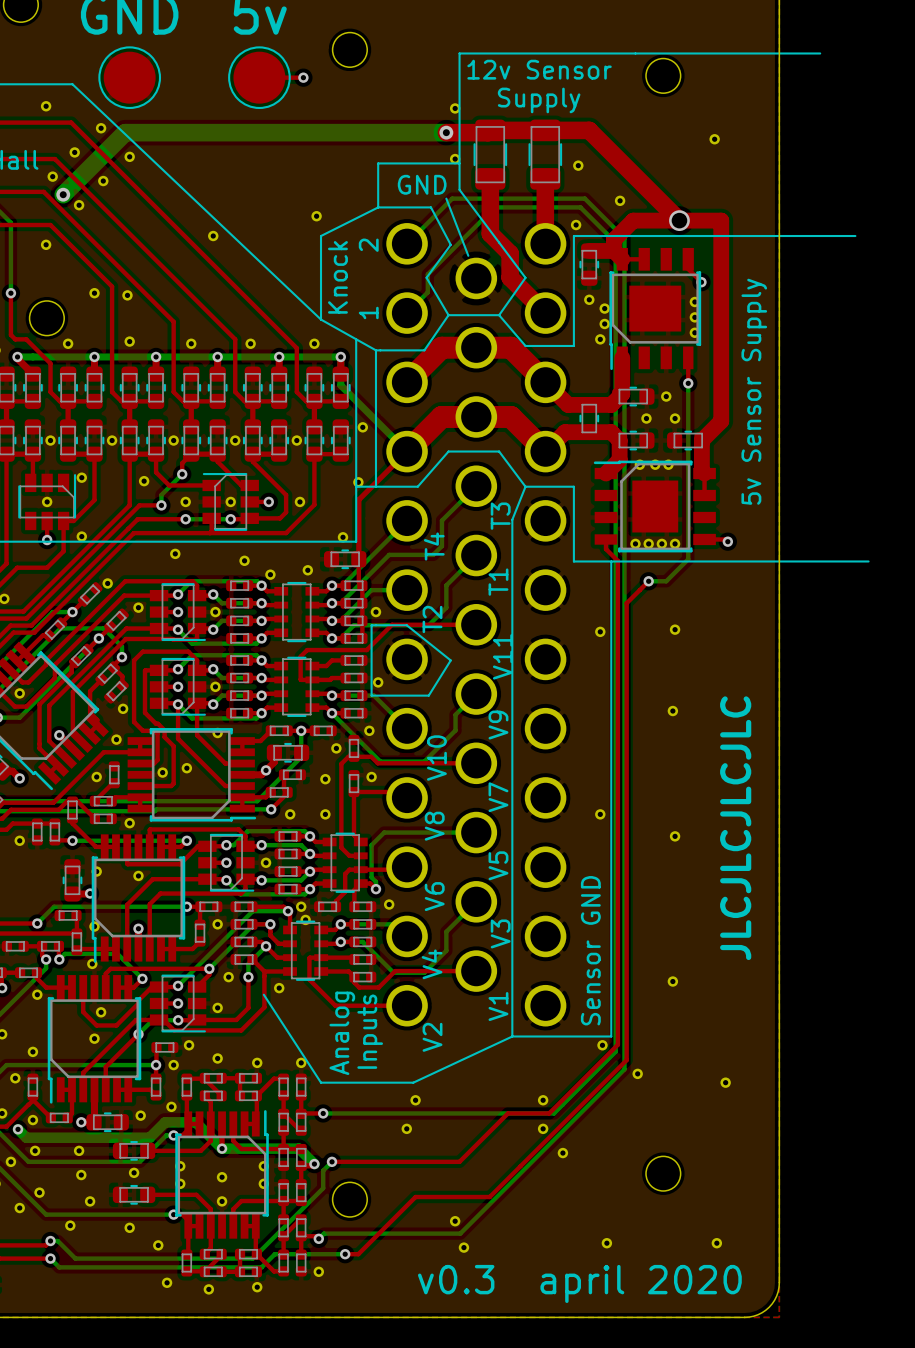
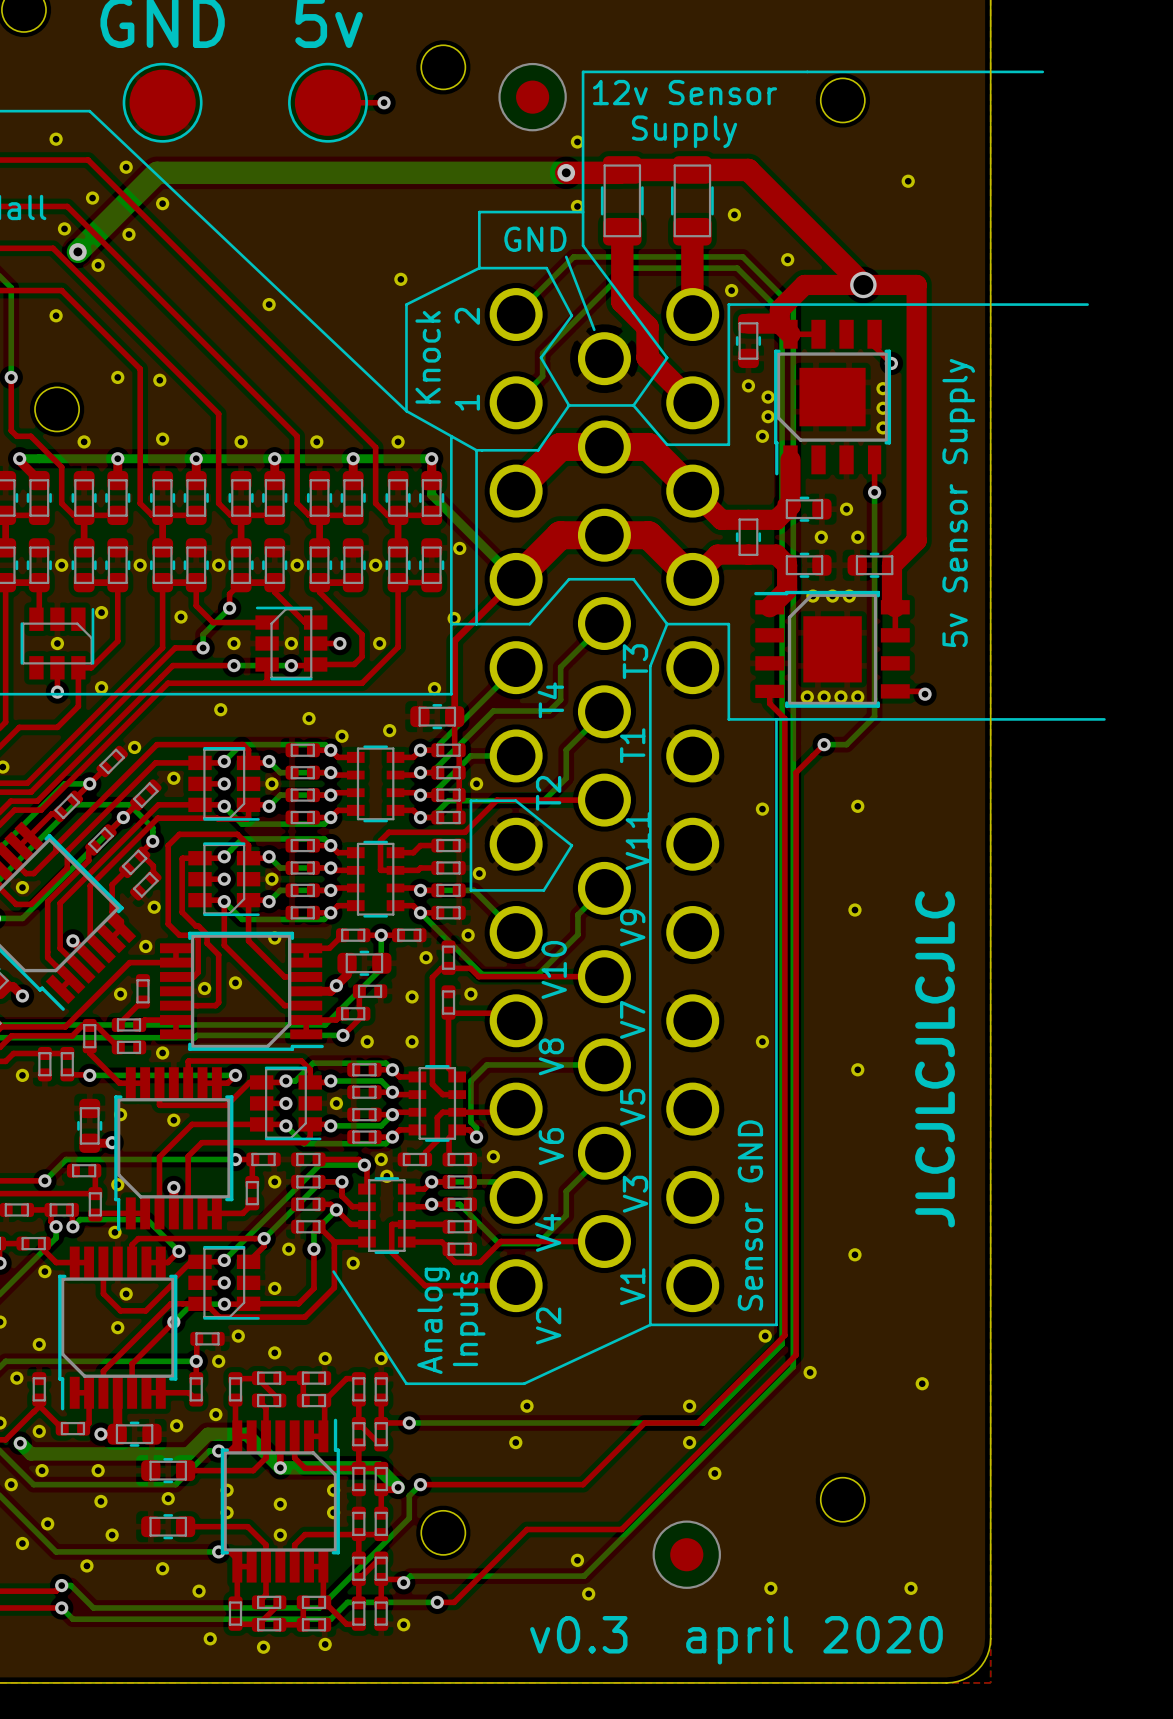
part: none -> (532, 97)
part: none -> (686, 1554)

